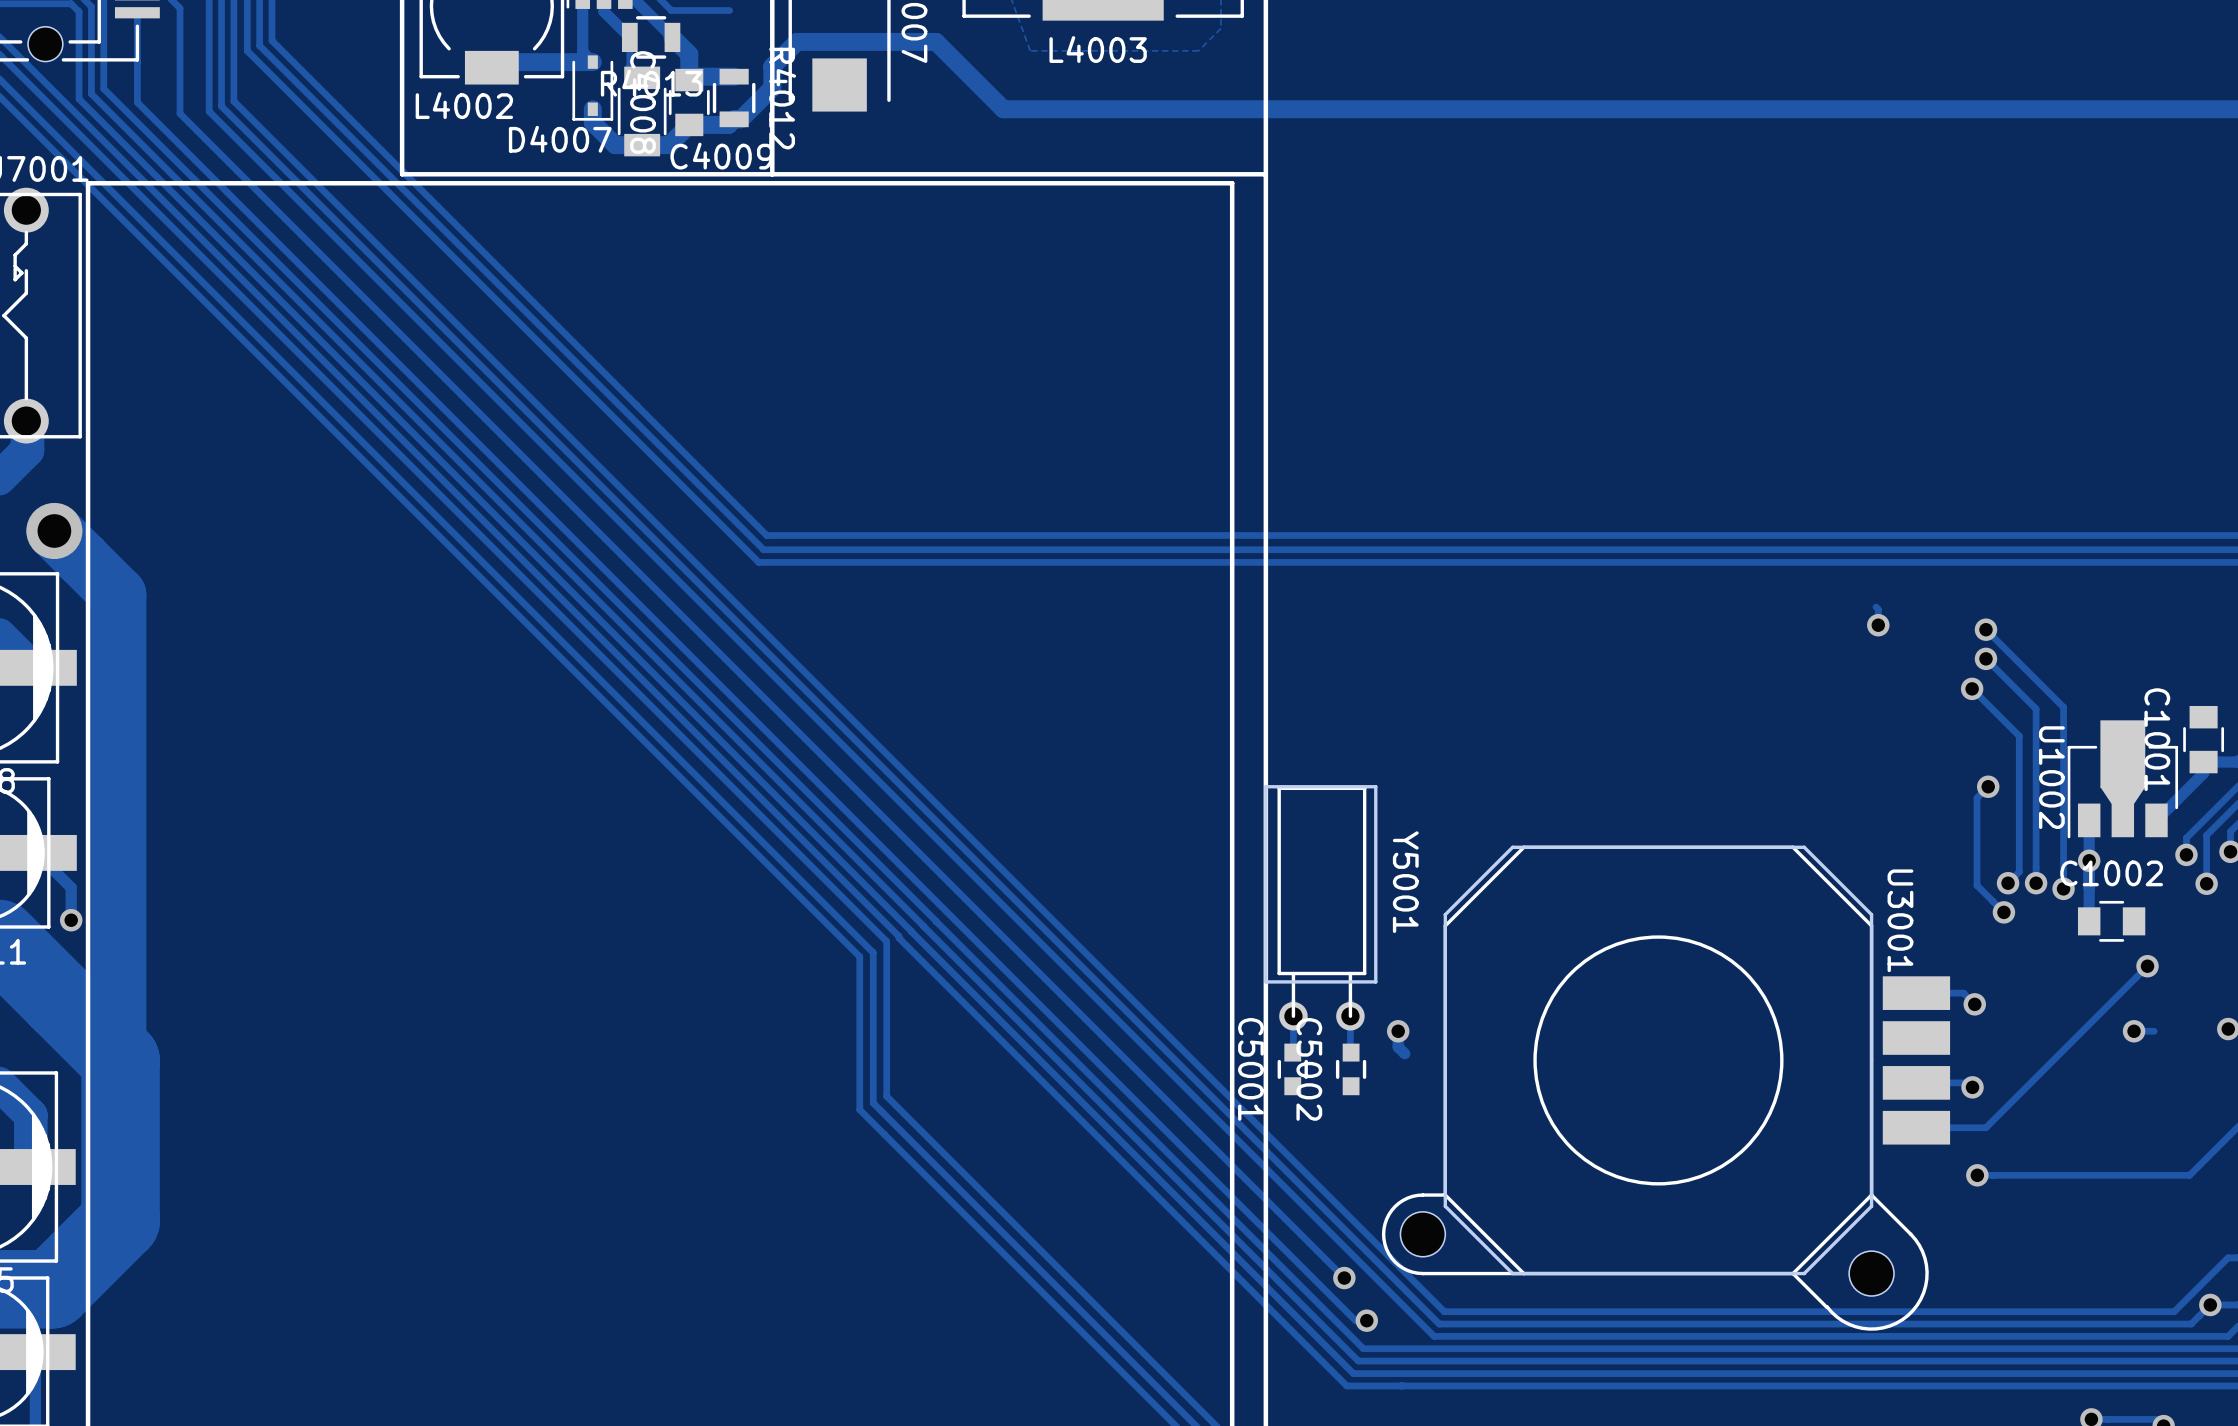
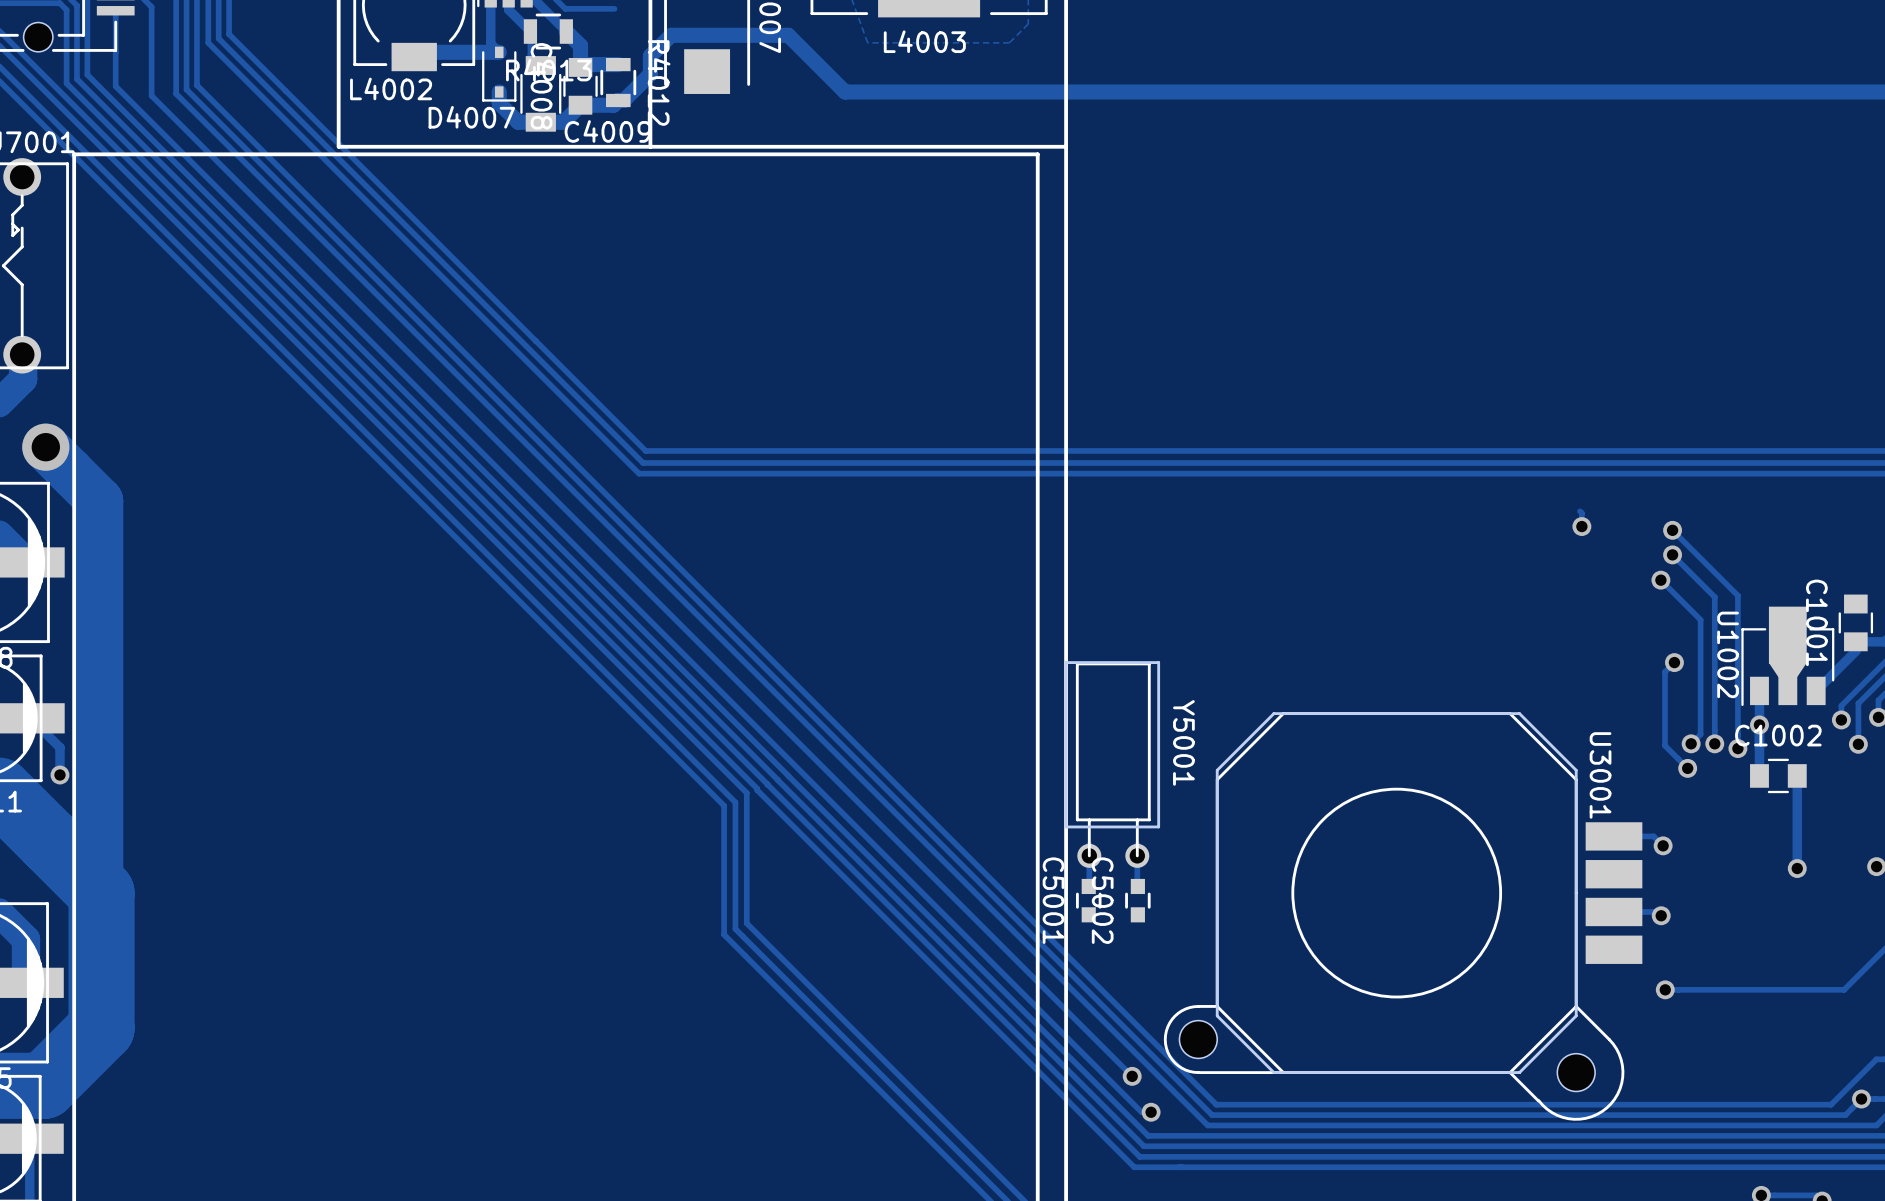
track: (2147, 966) (1985, 1127) (1916, 1127) -> none
via: (2147, 966) -> none
track: (1398, 1031) (1398, 1047) (1404, 1053) -> none
via: (1398, 1031) -> none
track: (2154, 1031) (2134, 1031) -> (1797, 775) (1797, 868)

